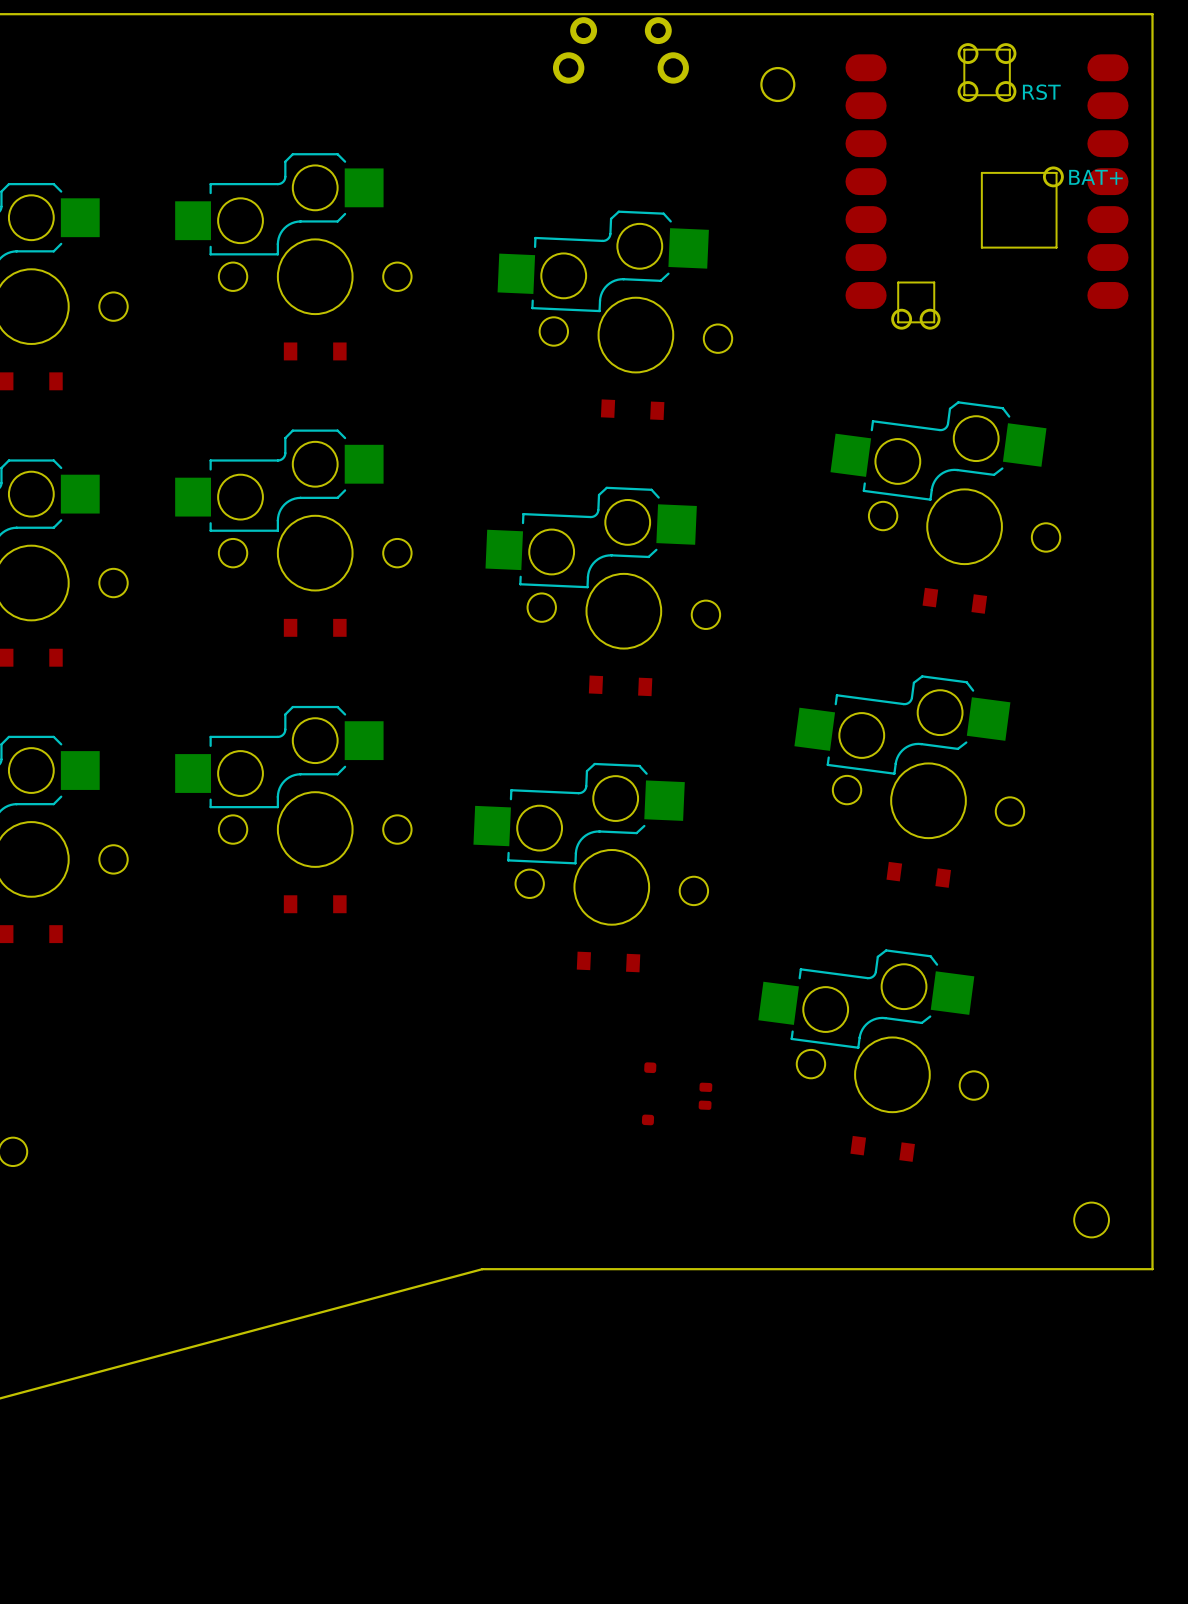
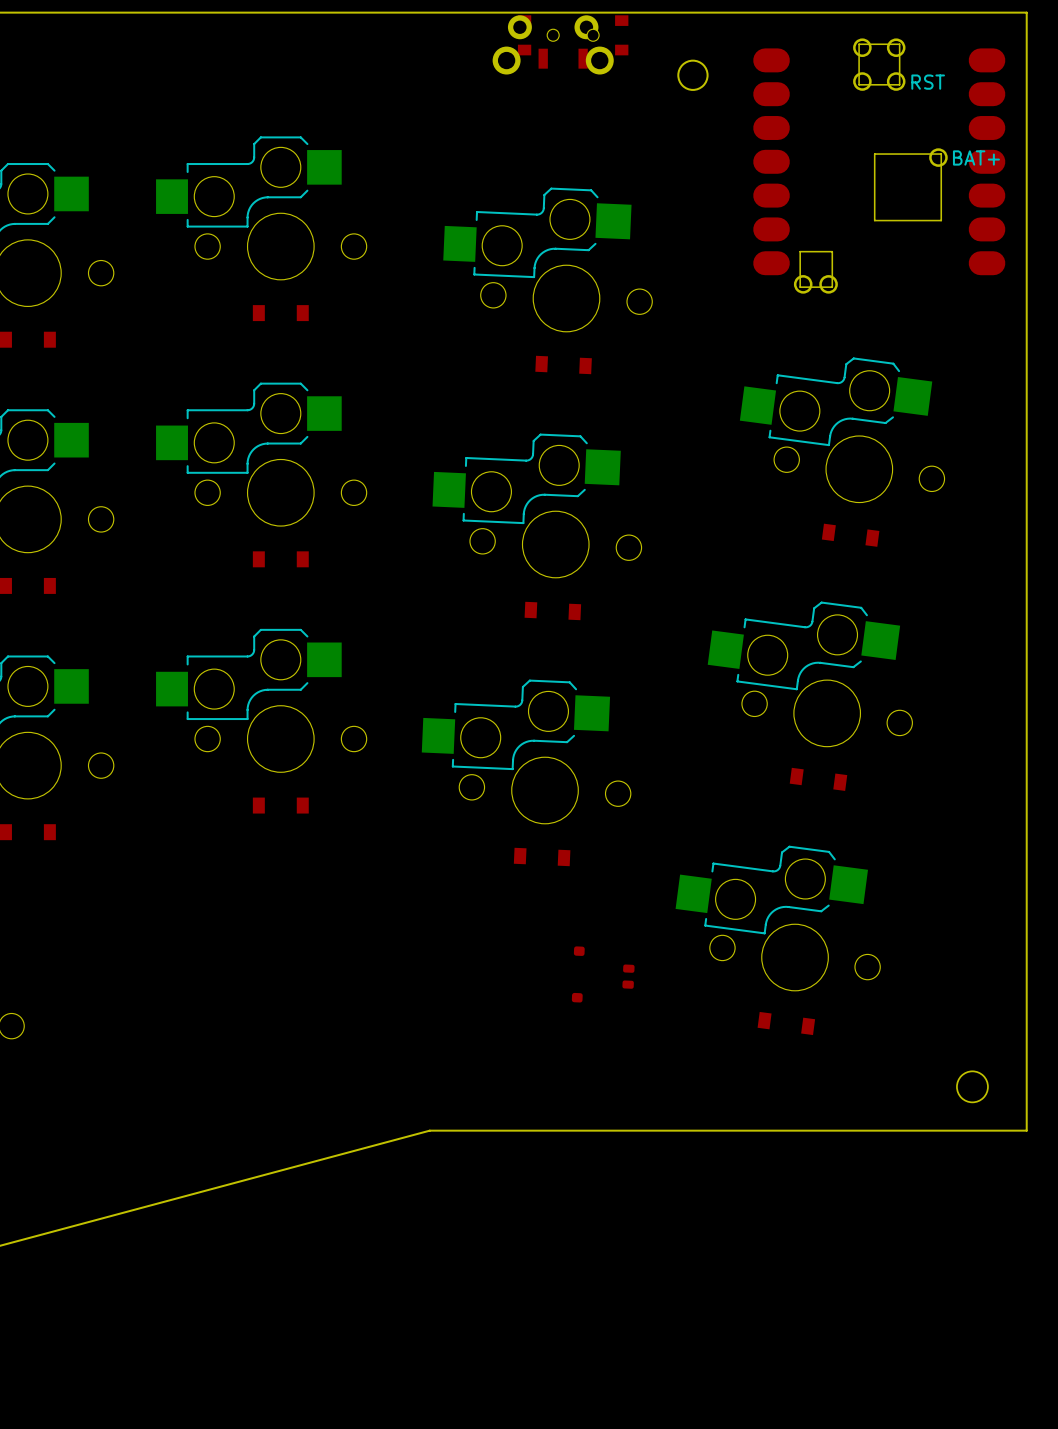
part: none -> (573, 41)

